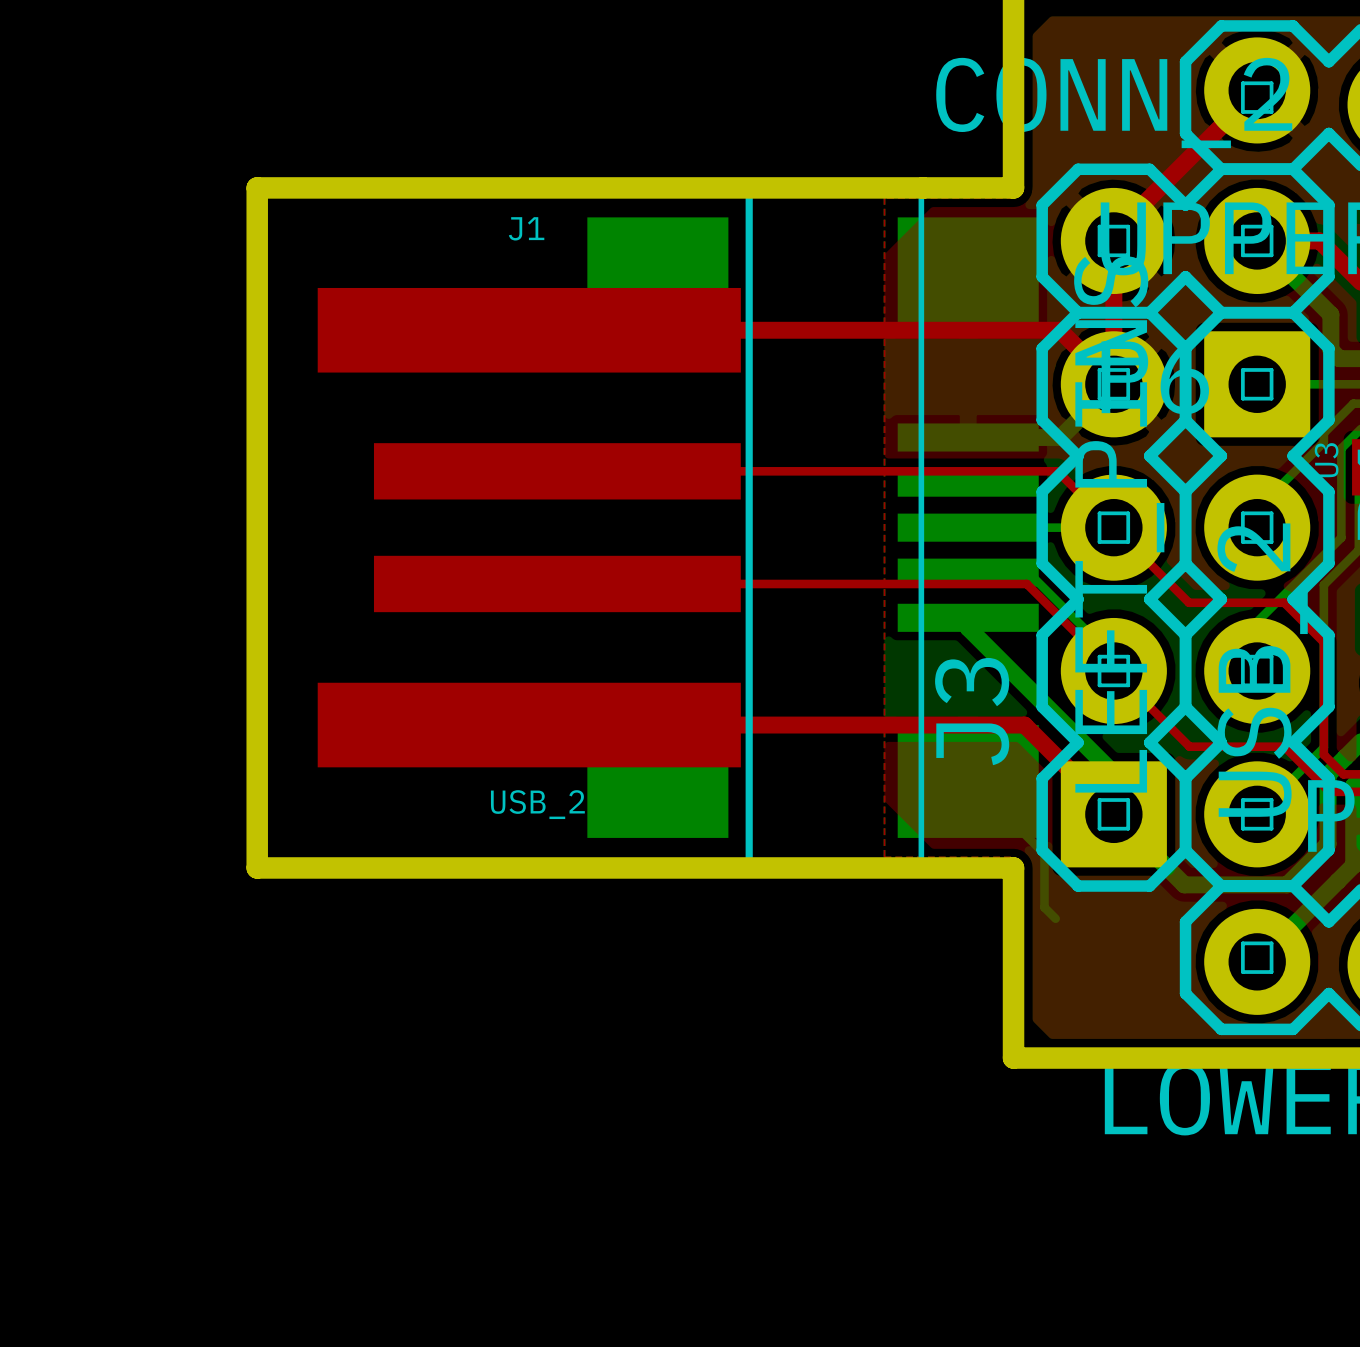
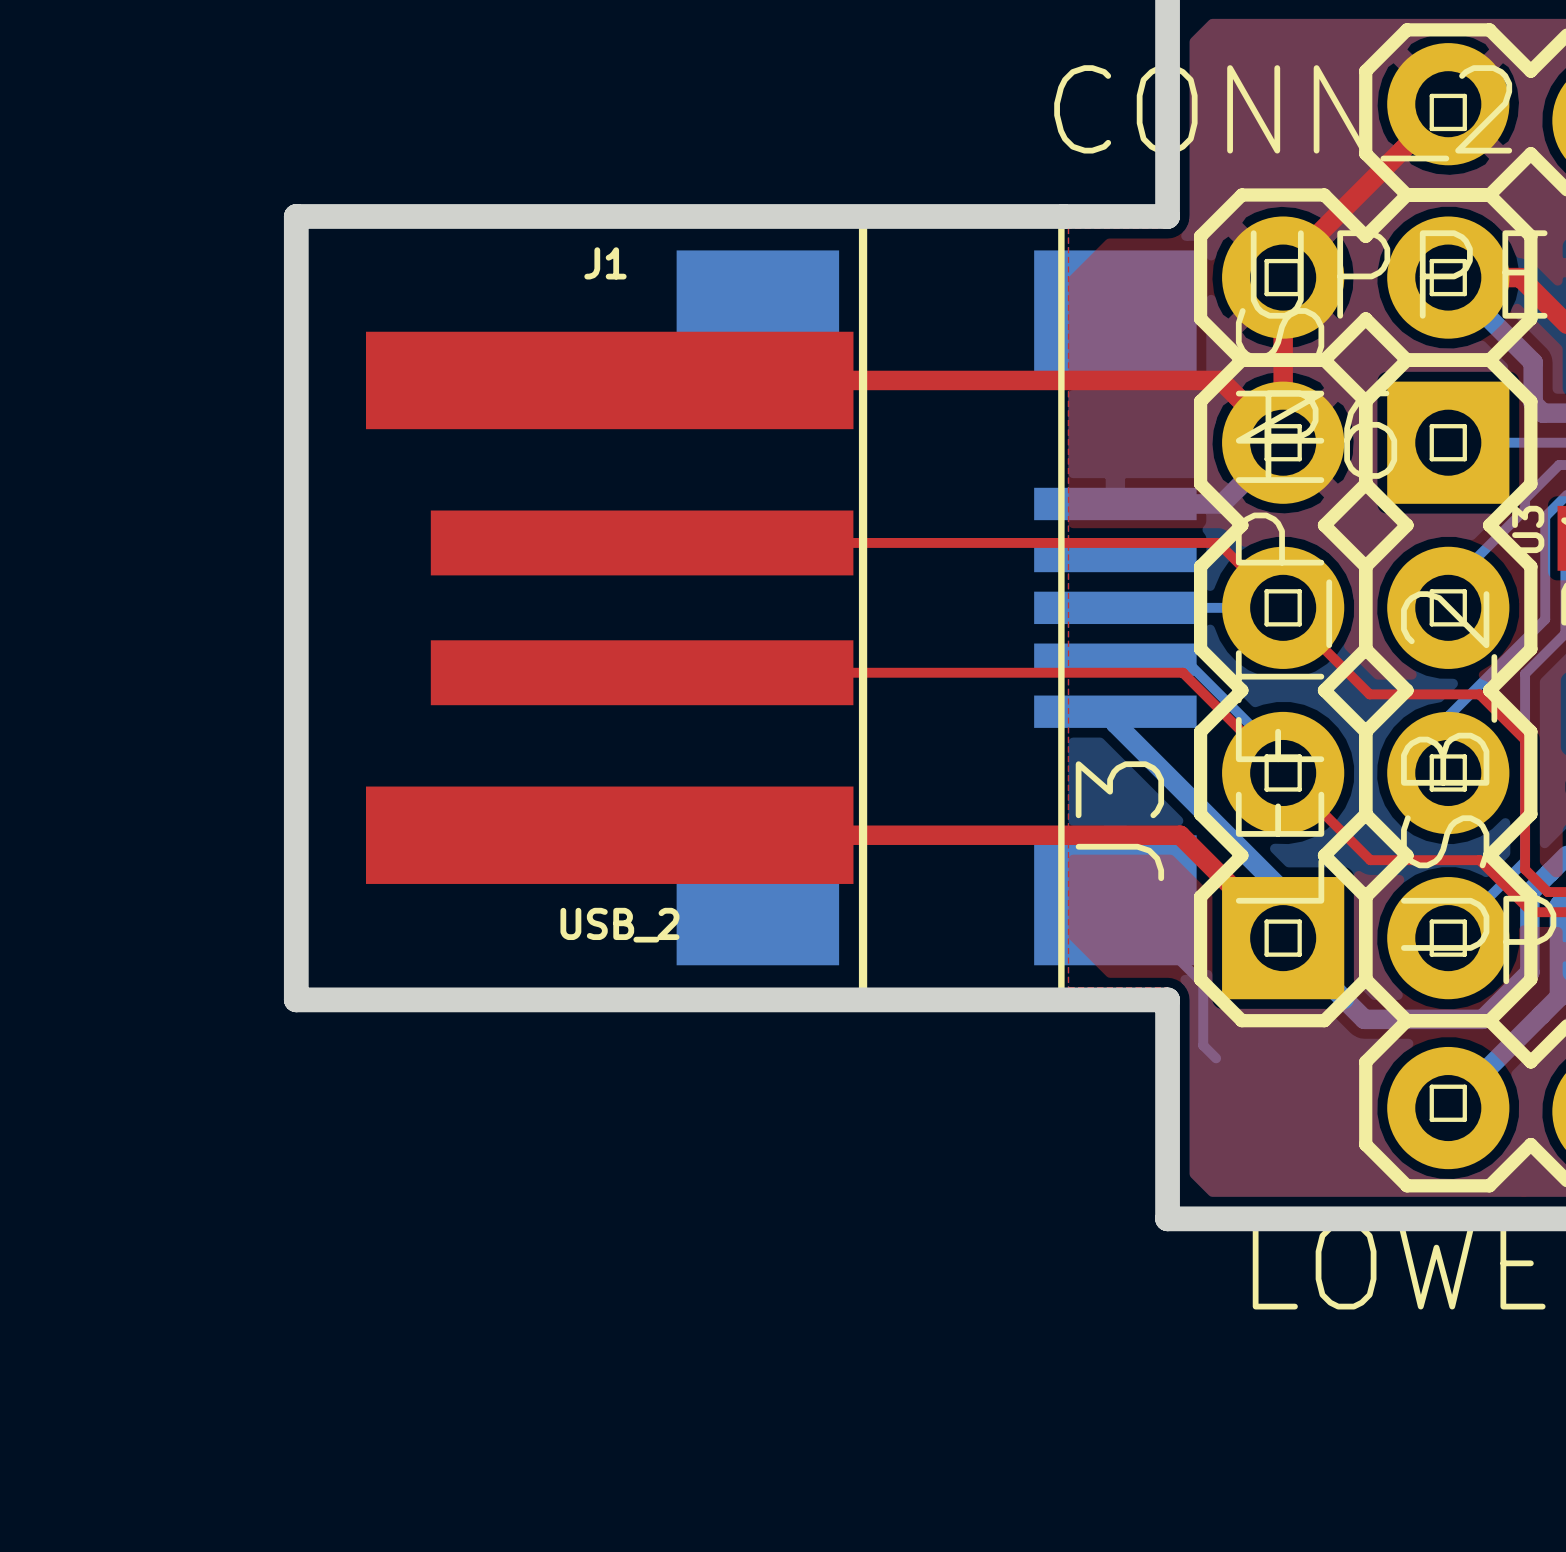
top zone outline: (927, 197) (884, 197) (884, 857) (927, 857) -> (1068, 228) (1068, 987)

